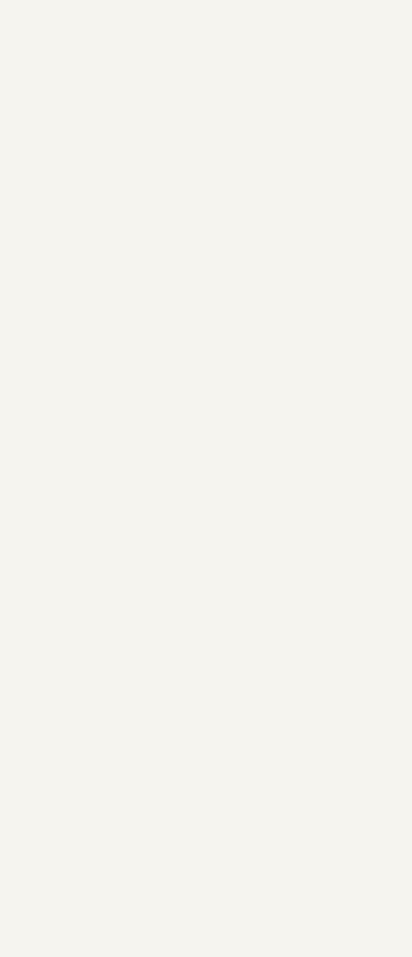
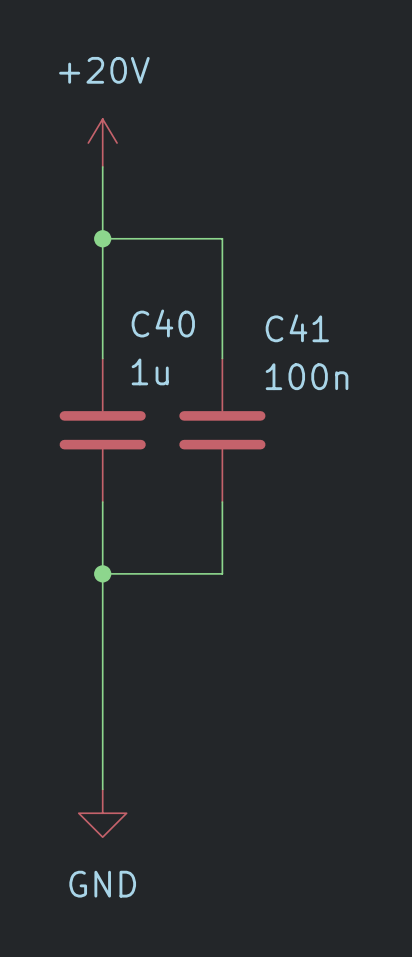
power symbol: none -> +20V (102, 143)
wire: none -> (102, 166) (102, 358)
wire: none -> (102, 238) (222, 238) (222, 358)
junction: none -> (102, 238)
C40: none -> 1u (102, 430)
C41: none -> 100n (222, 430)
wire: none -> (102, 502) (102, 789)
wire: none -> (222, 502) (222, 573) (102, 573)
junction: none -> (102, 573)
power symbol: none -> GND (102, 813)

